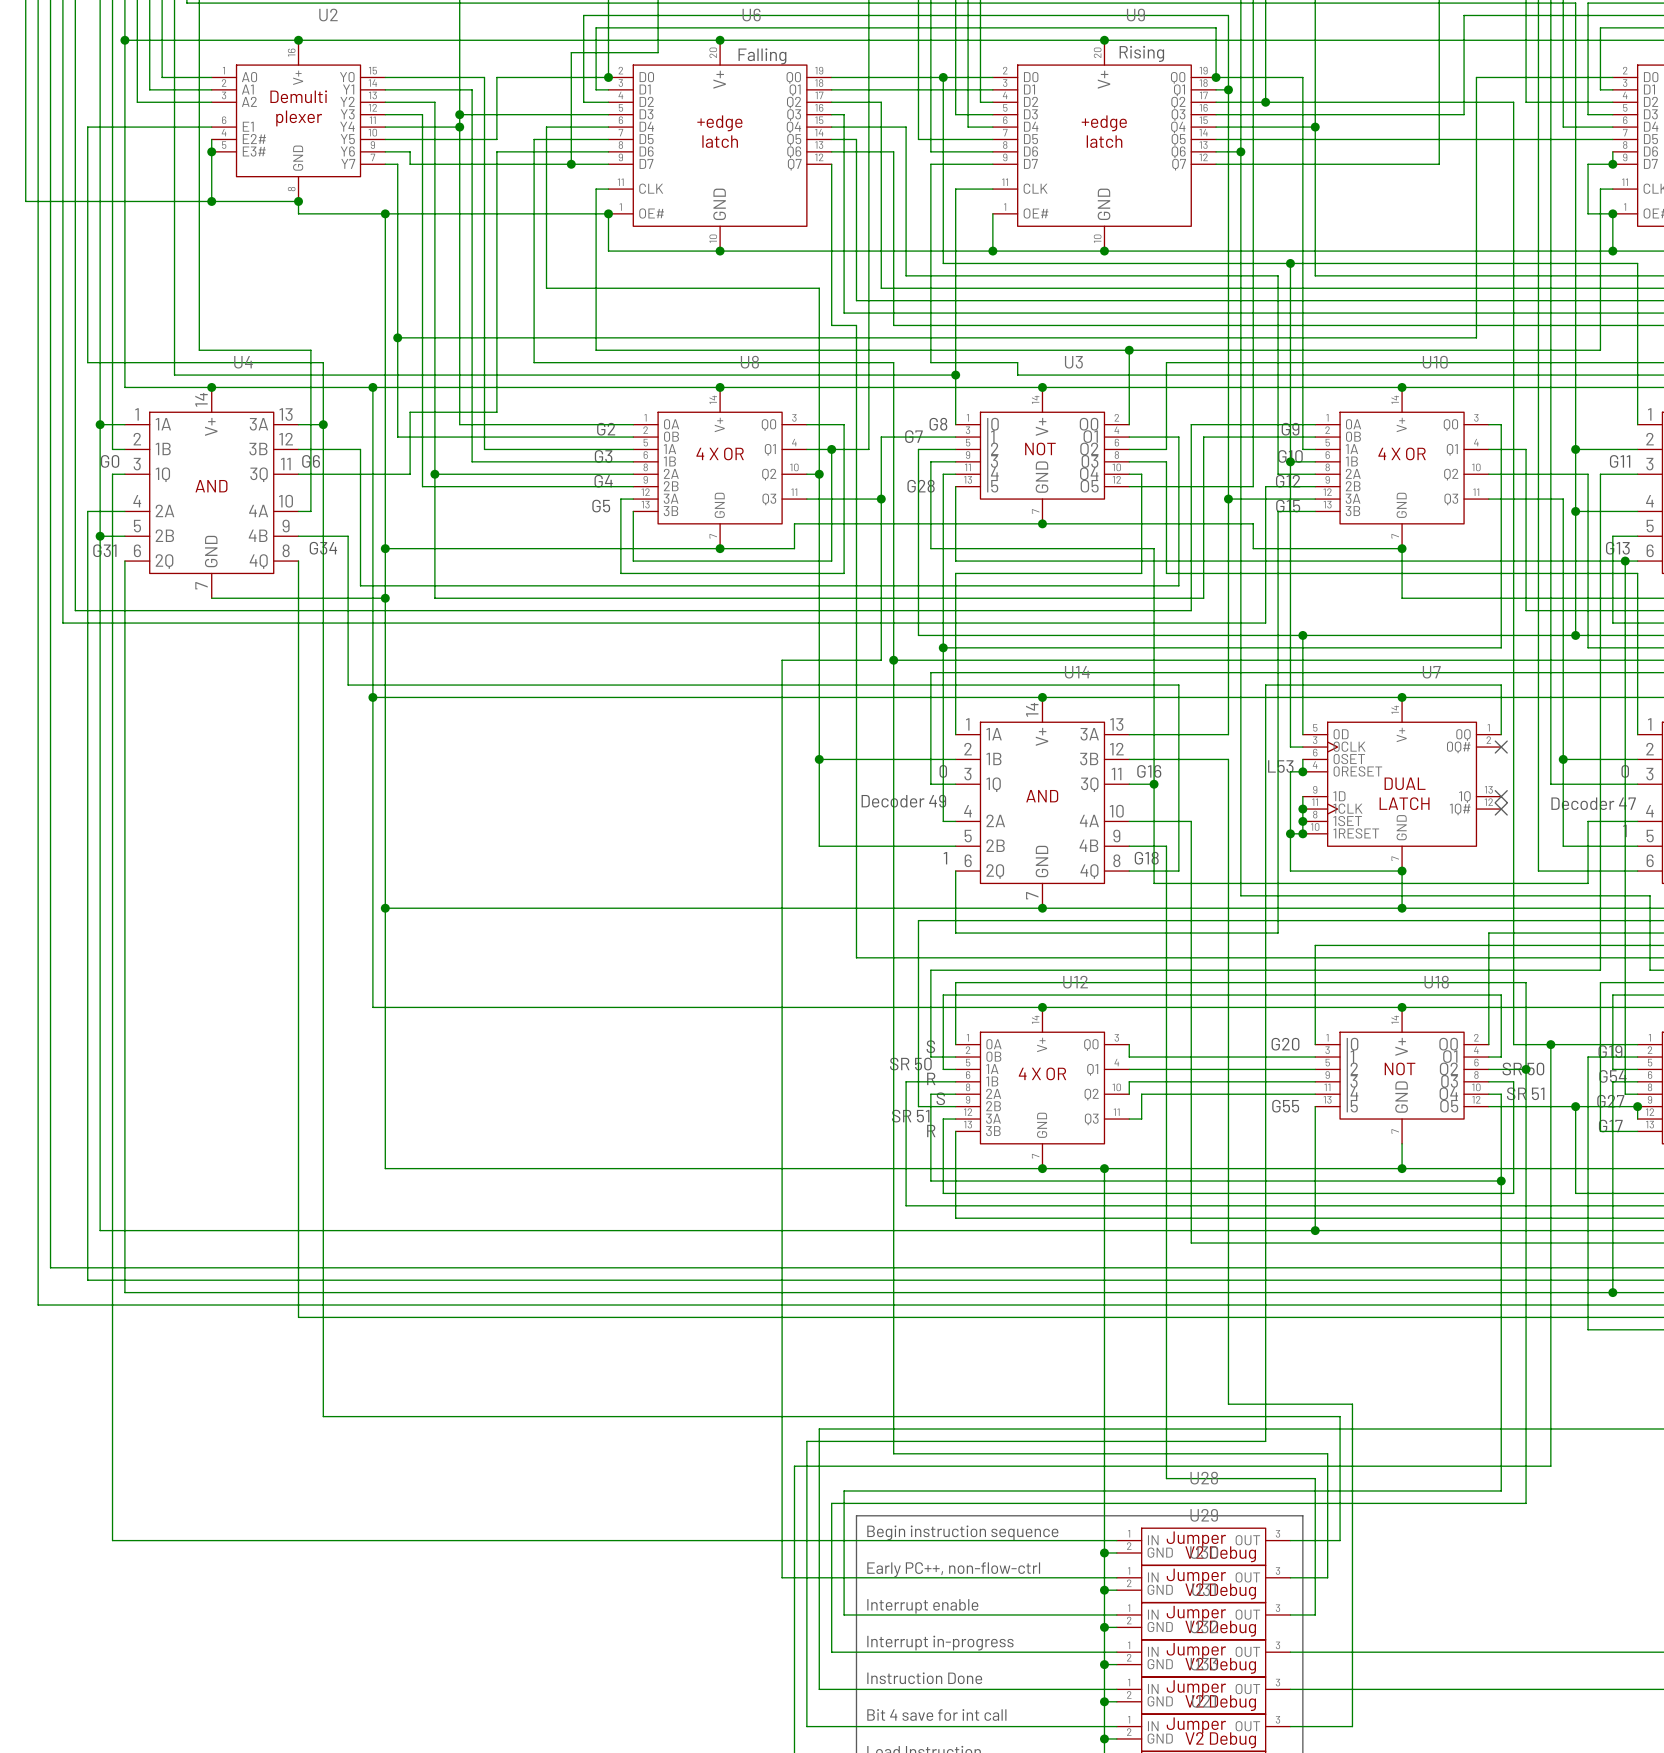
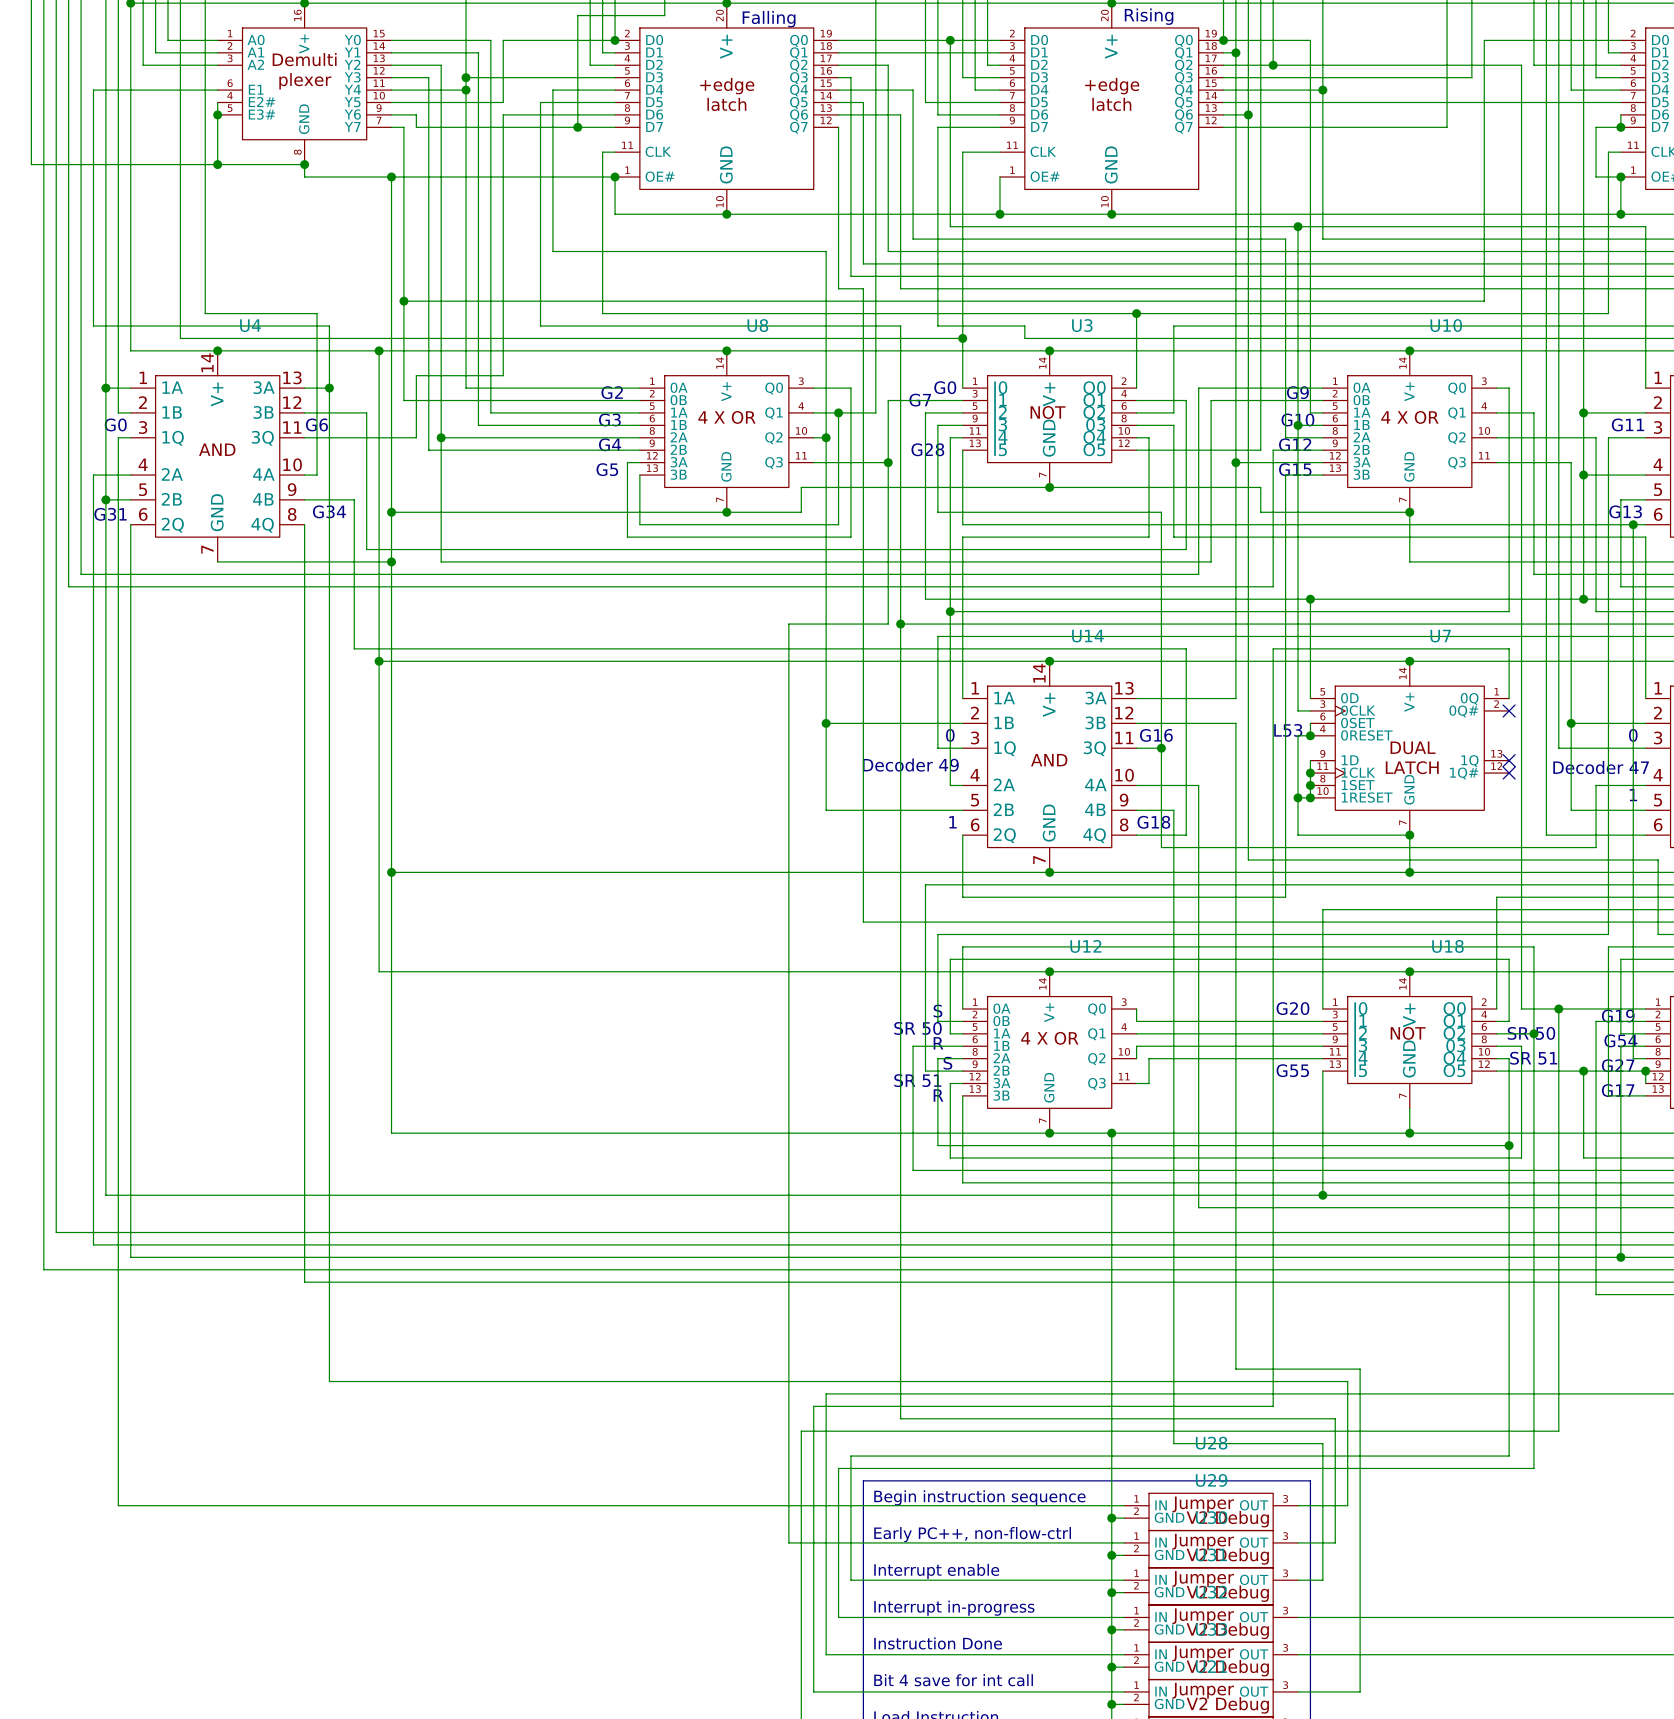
text: G8 (938, 424) -> G0 (945, 387)

